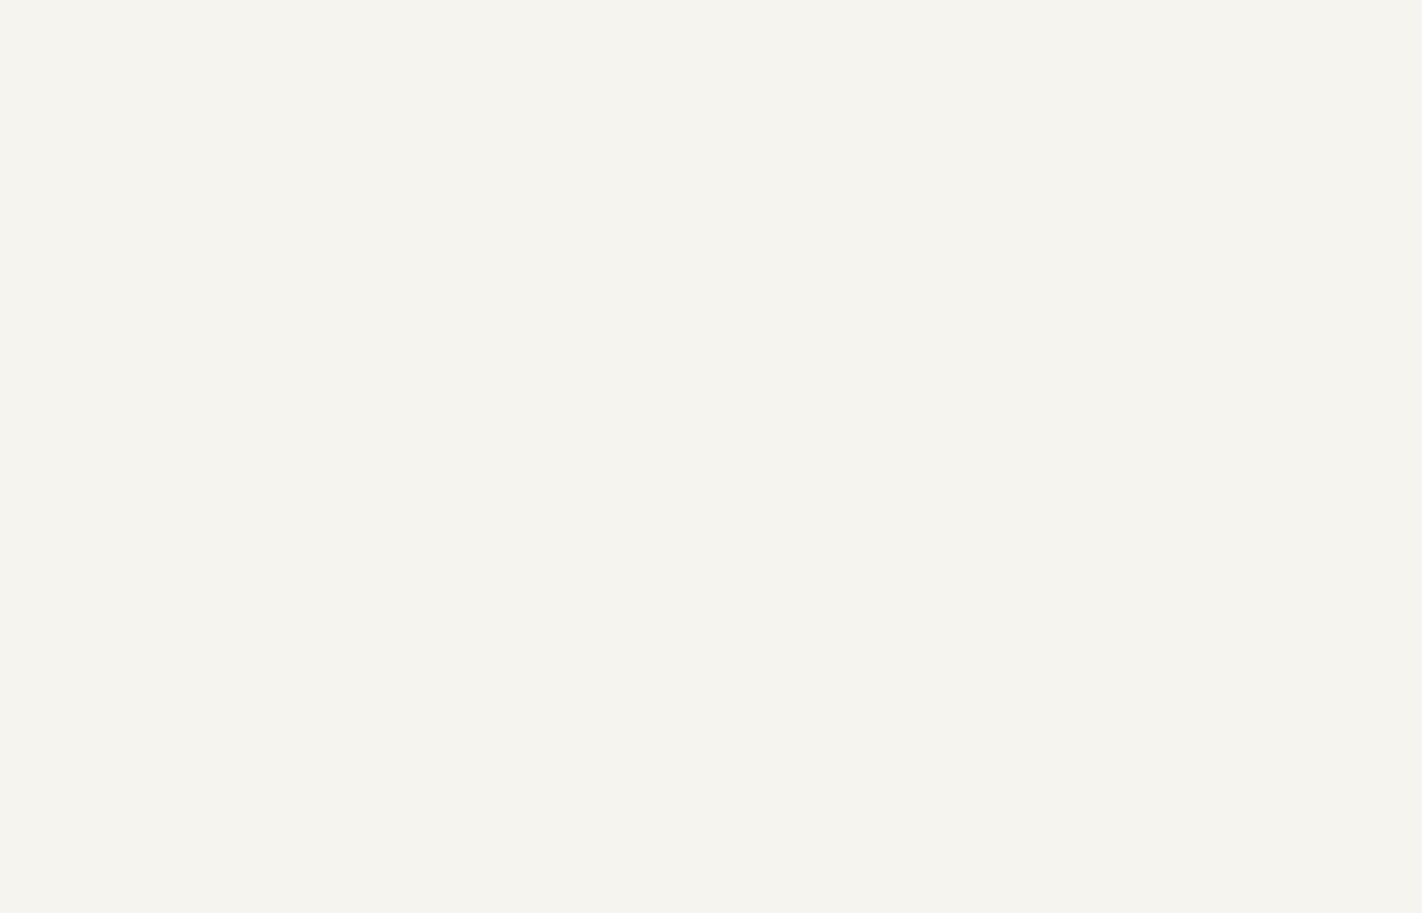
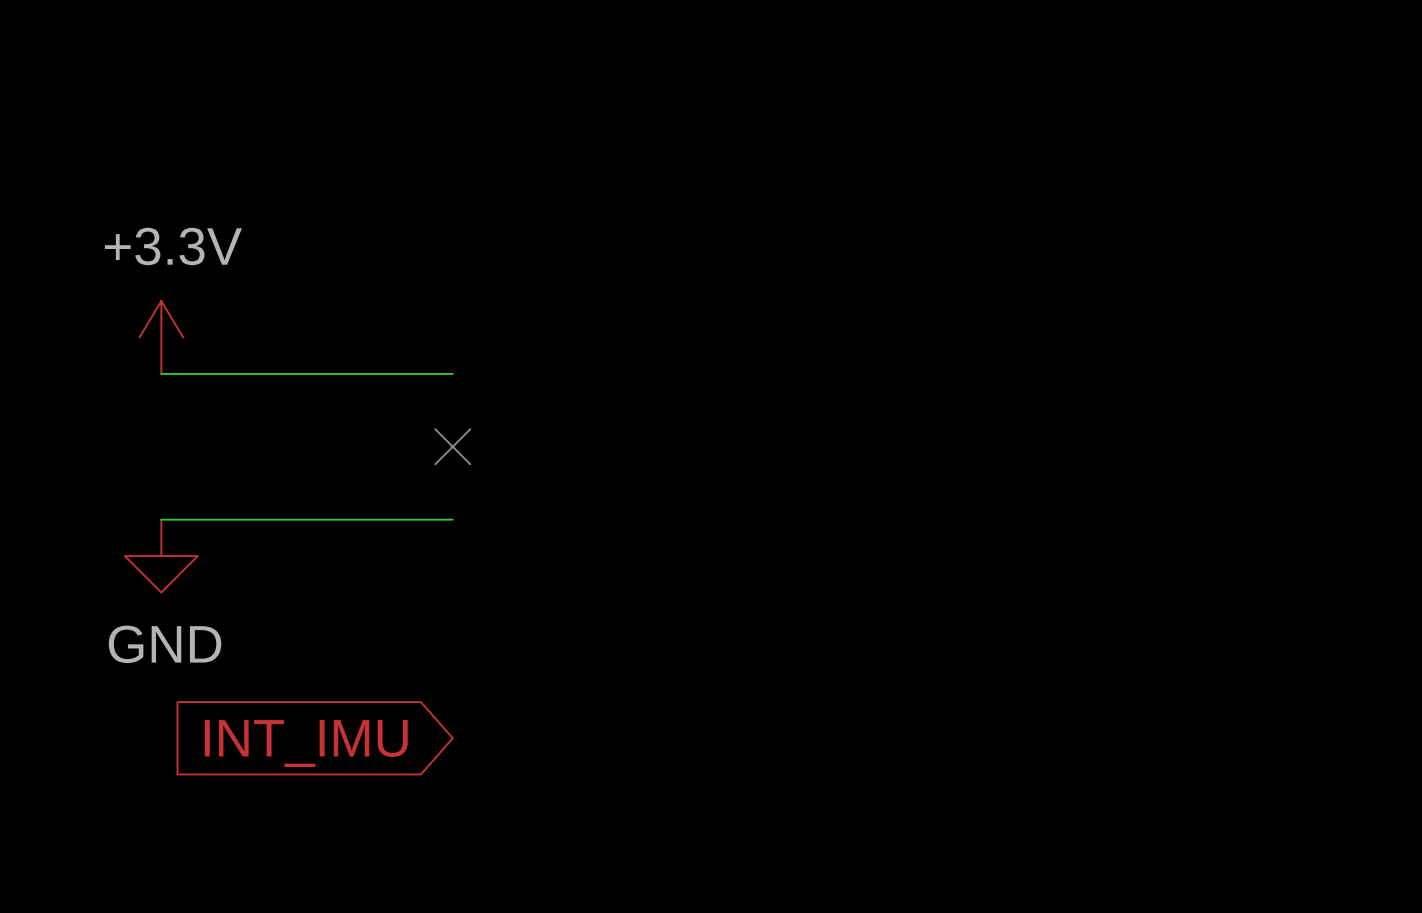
power symbol: none -> +3.3V (161, 337)
wire: none -> (161, 373) (452, 373)
no-connect mark: none -> (452, 446)
wire: none -> (161, 519) (452, 519)
power symbol: none -> GND (161, 556)
global label: none -> INT_IMU (306, 743)

